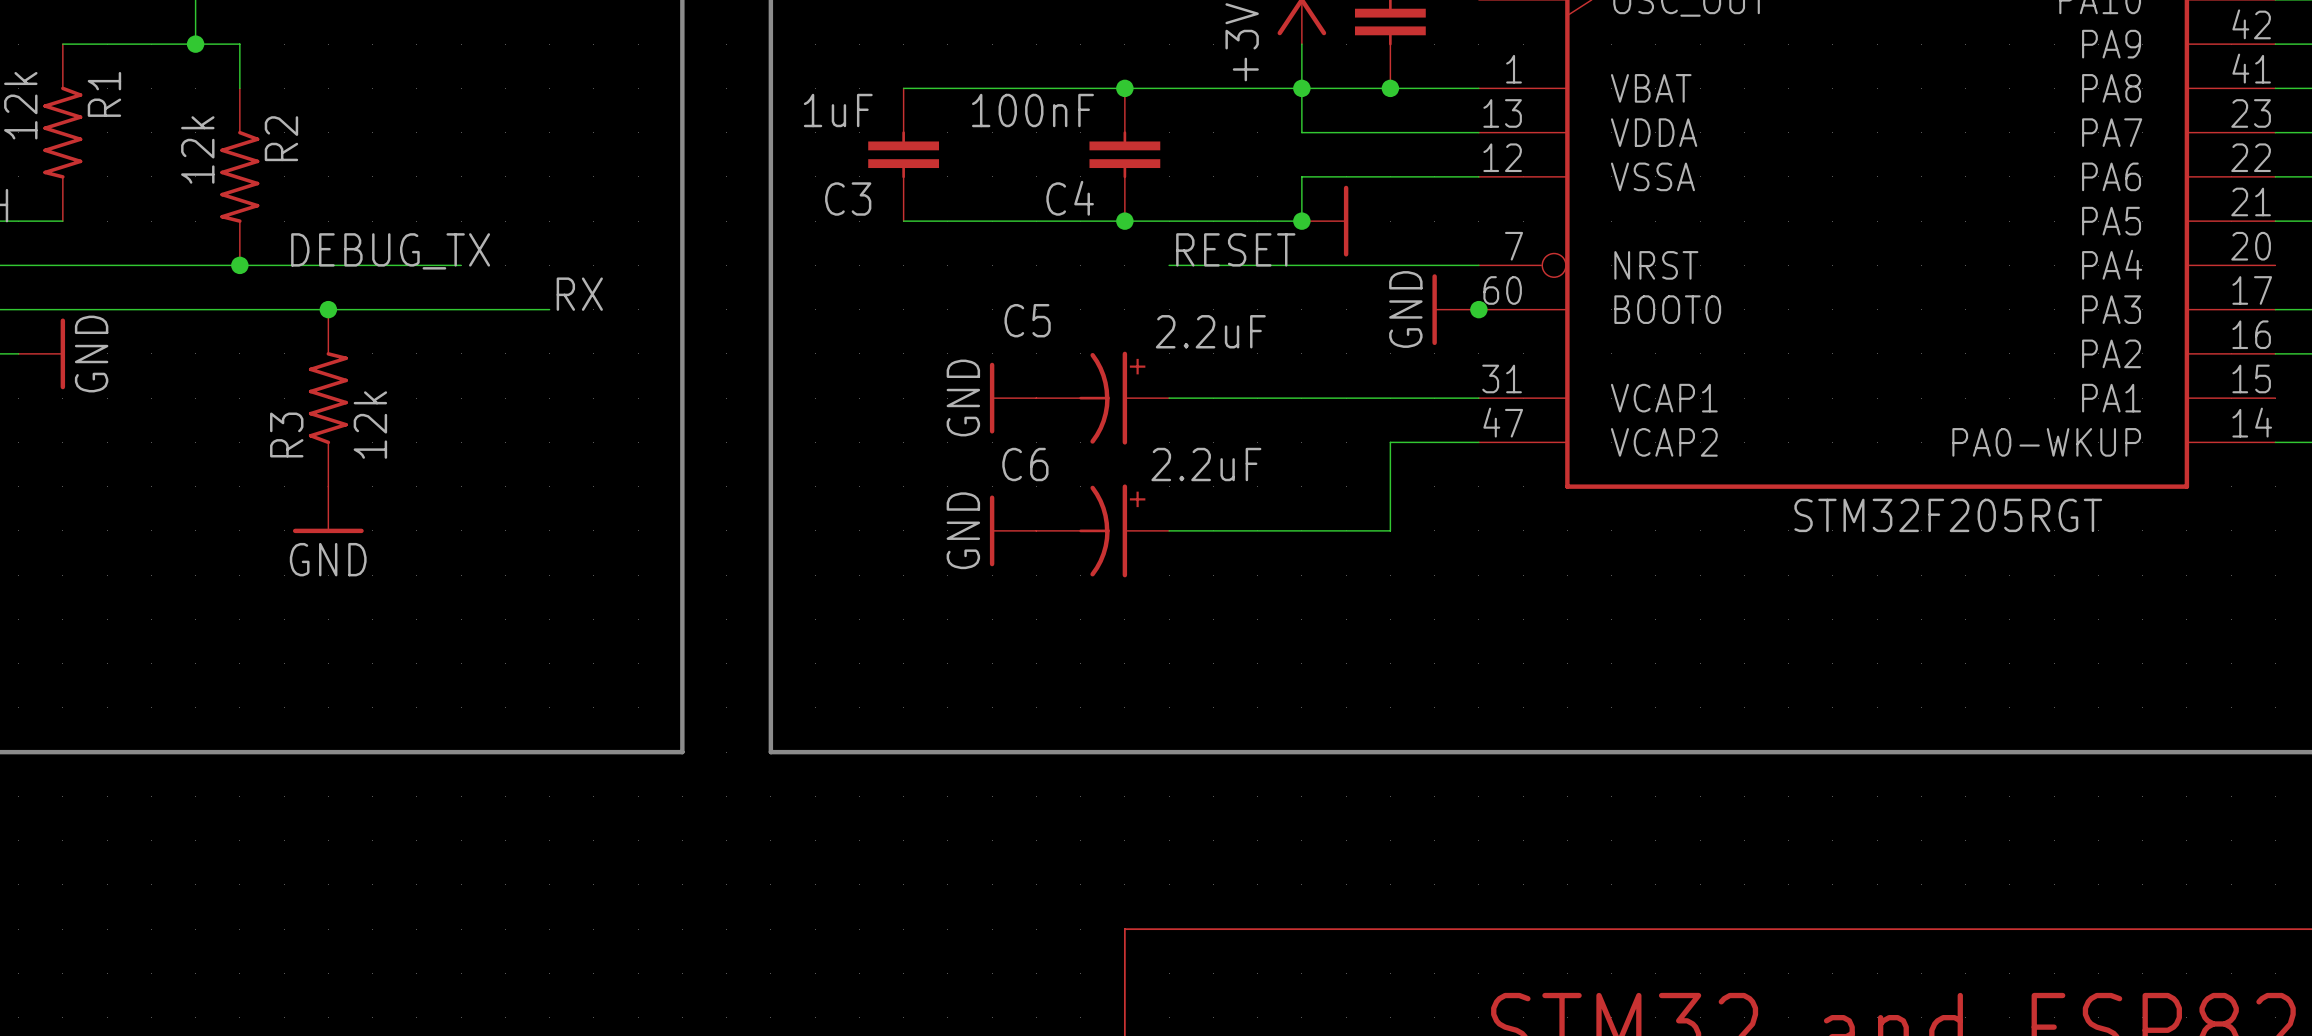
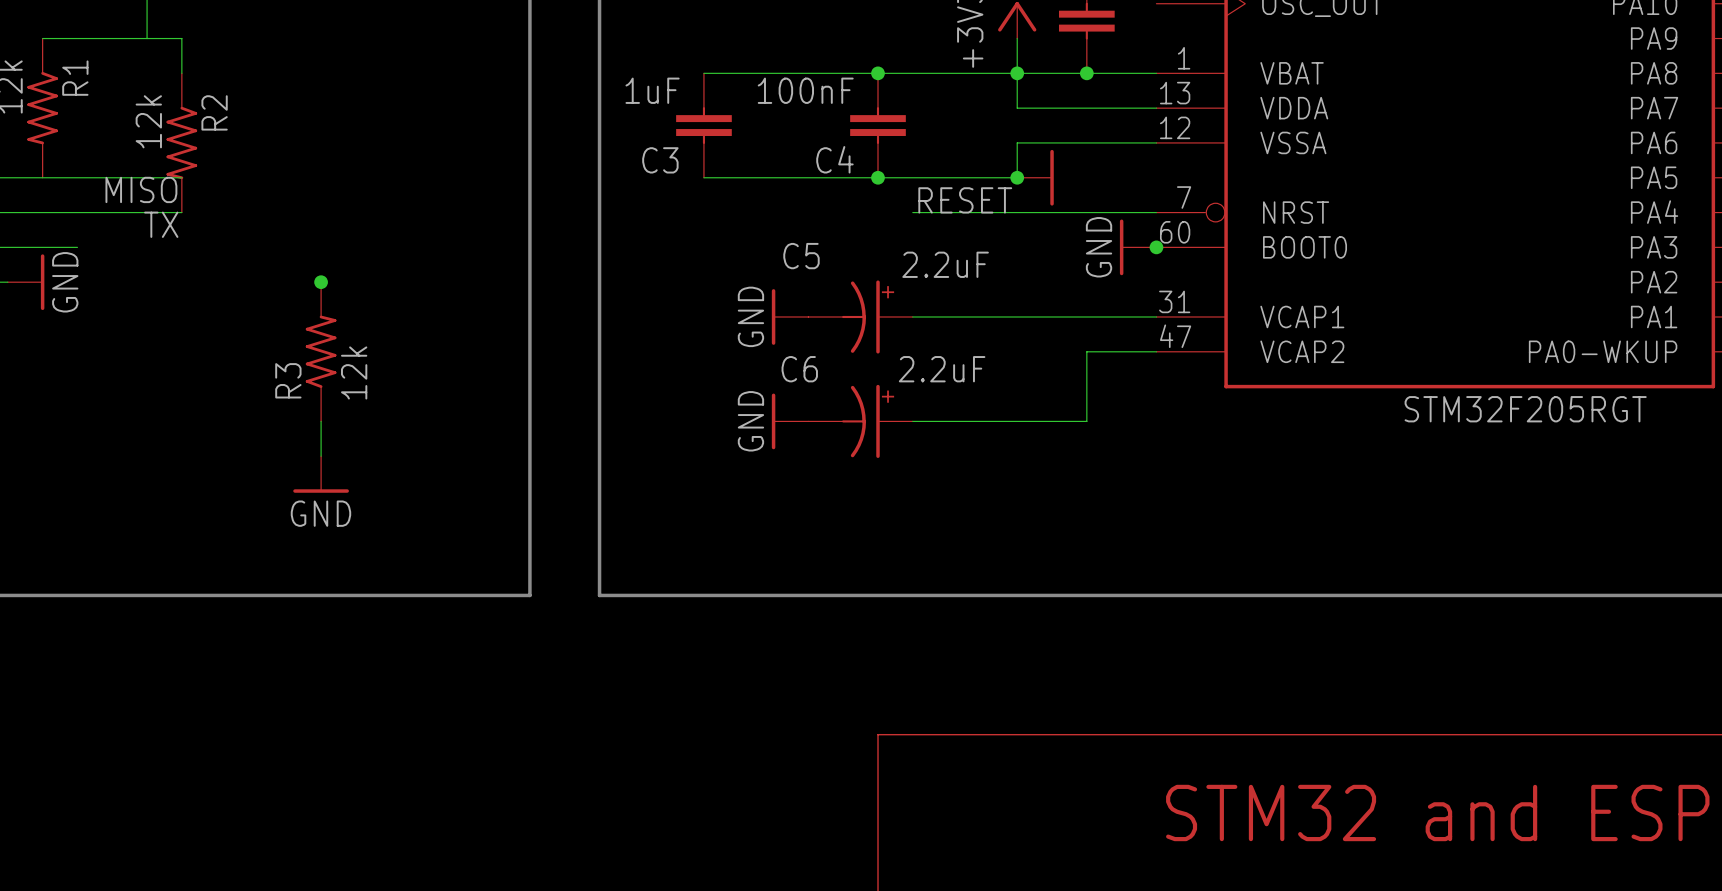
junction: (195, 44) -> none
wire: none -> (42, 177) (181, 177)
label: none -> MISO (141, 189)
label: DEBUG_TX (390, 251) -> none
wire: (239, 265) (461, 265) -> none
junction: (239, 265) -> none
label: none -> TX (161, 224)
label: RX (579, 294) -> none
wire: (107, 309) (549, 309) -> none
junction: (328, 309) -> none
junction: none -> (321, 282)
R3 position: (328, 398) -> (321, 351)
power symbol position: GND (328, 509) -> GND (321, 474)
wire: none -> (321, 421) (321, 456)

